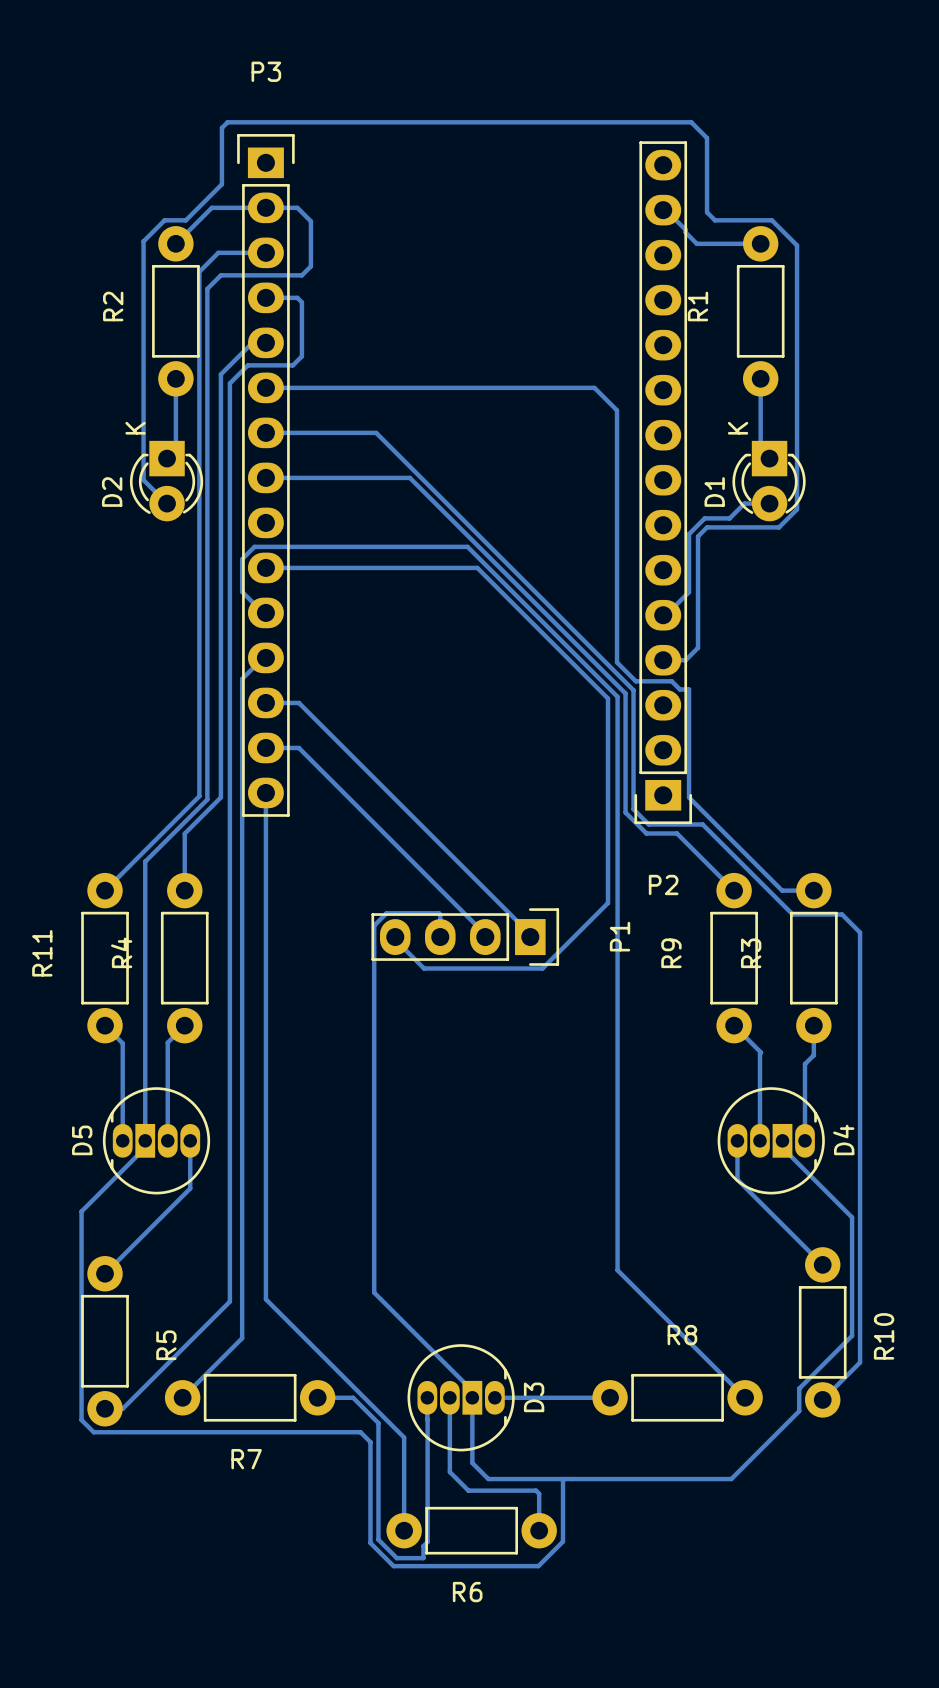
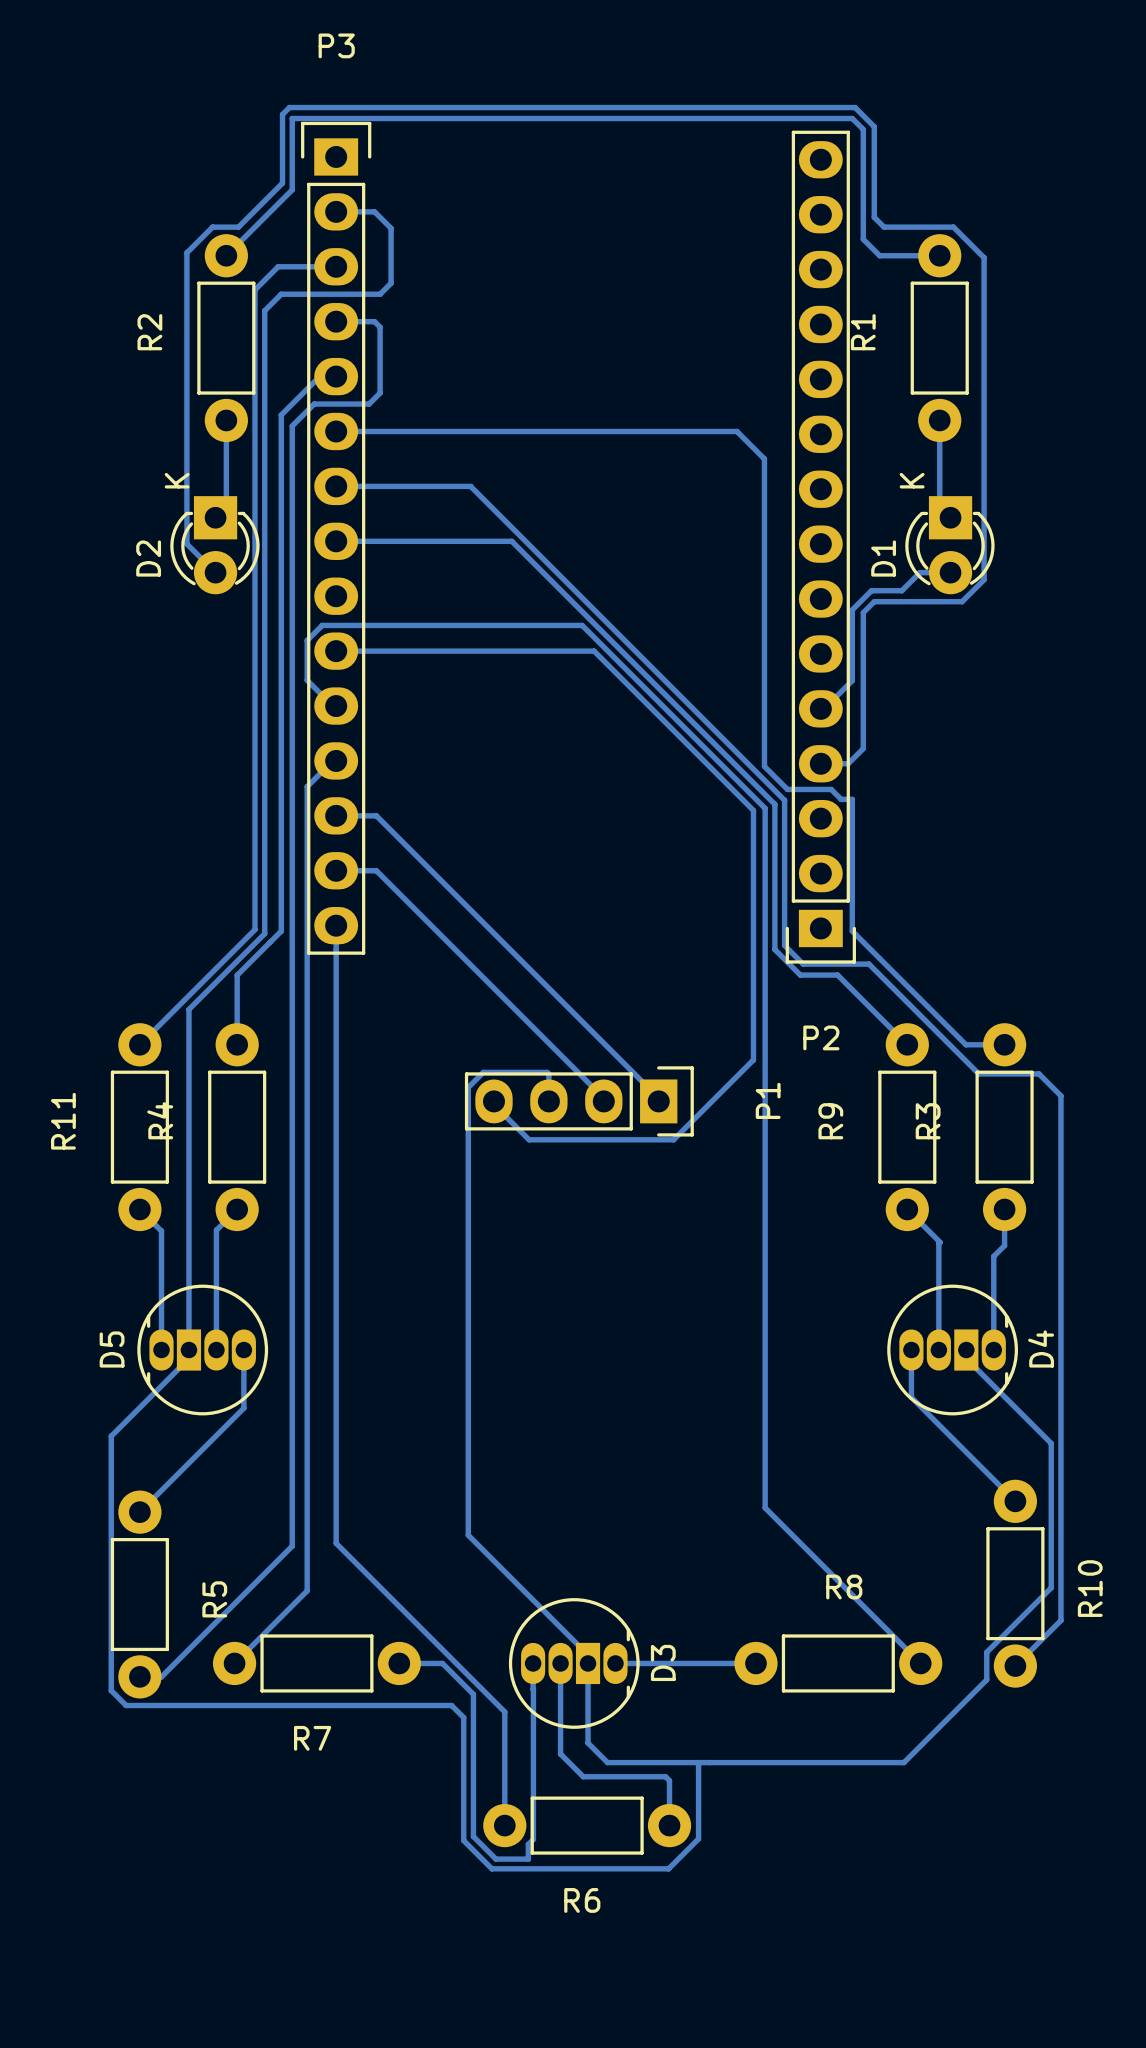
bottom track: (211, 207) (265, 207) -> (270, 211) (292, 189) (292, 118) (852, 118) (863, 129) (863, 239) (879, 255)
bottom track: (663, 210) (665, 210) (685, 229) (685, 232) (696, 243) (711, 243) -> none

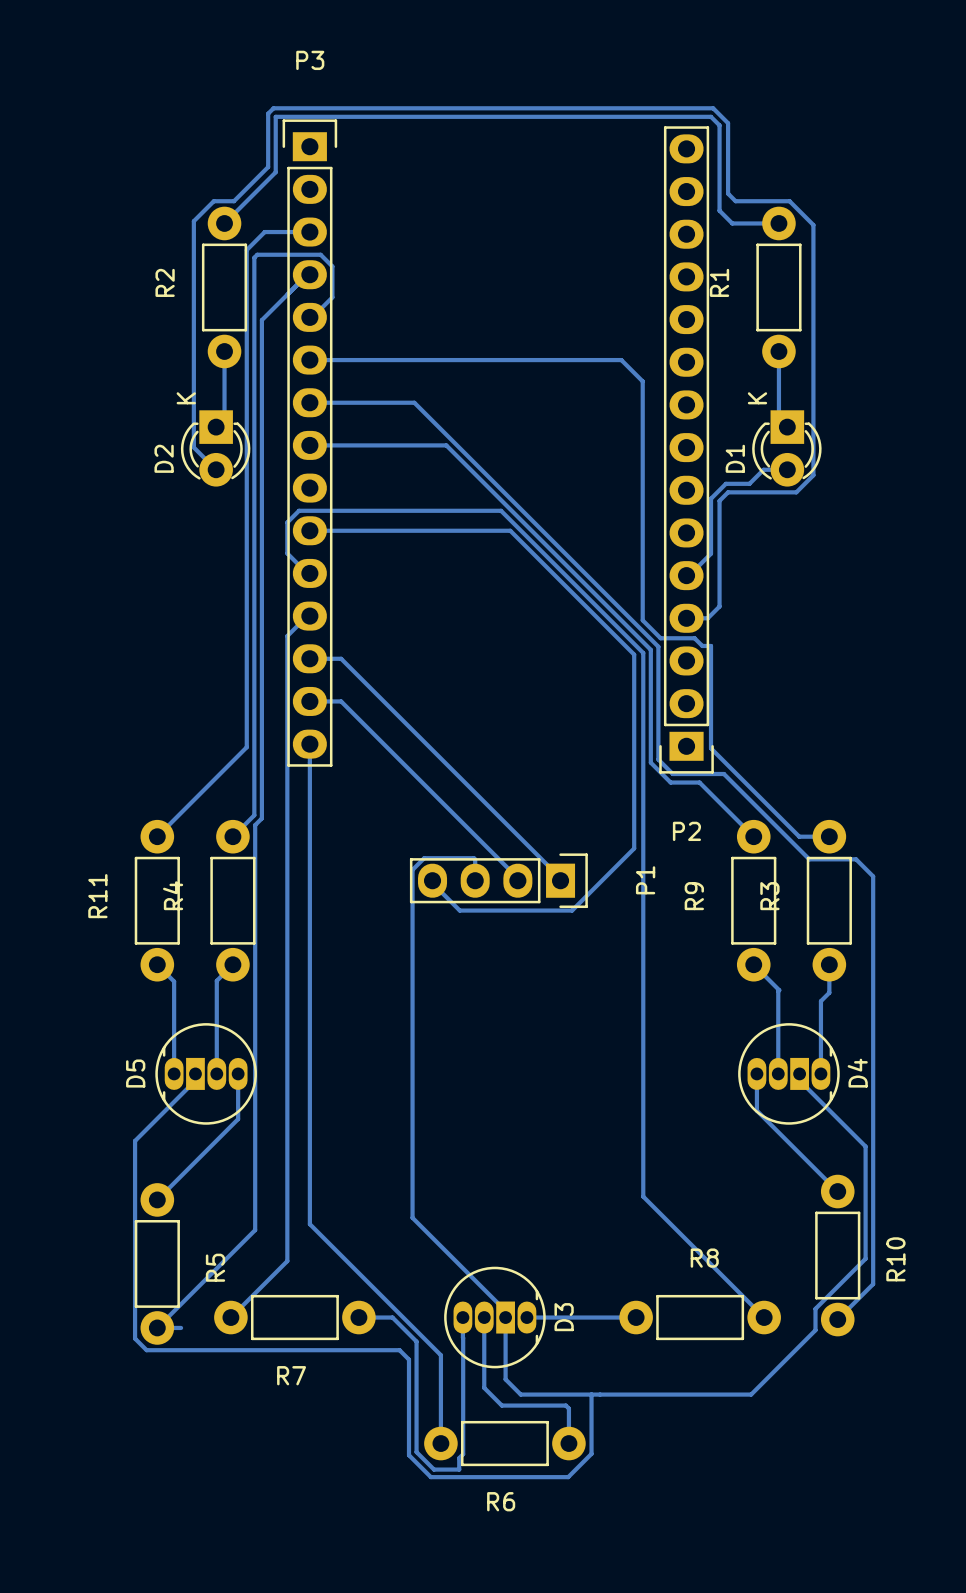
bottom track: (336, 211) (374, 211) (391, 228) (391, 283) (380, 294) (281, 294) (264, 310) -> (312, 317) (332, 297) (332, 266) (320, 254) (257, 254) (254, 257) (254, 266)
bottom track: none -> (307, 274) (261, 320) (261, 818) (255, 825) (255, 1230) (157, 1327)
bottom track: (336, 321) (374, 321) (380, 327) (380, 393) (369, 404) (314, 404) (292, 426) (292, 1546) (161, 1676) -> (181, 1327) (174, 1327)
bottom track: (336, 376) (319, 376) (281, 415) (281, 931) (237, 975) (237, 1044) -> none
bottom track: (264, 933) (188, 1009) (188, 1350) -> (254, 750) (254, 815) (232, 836)

